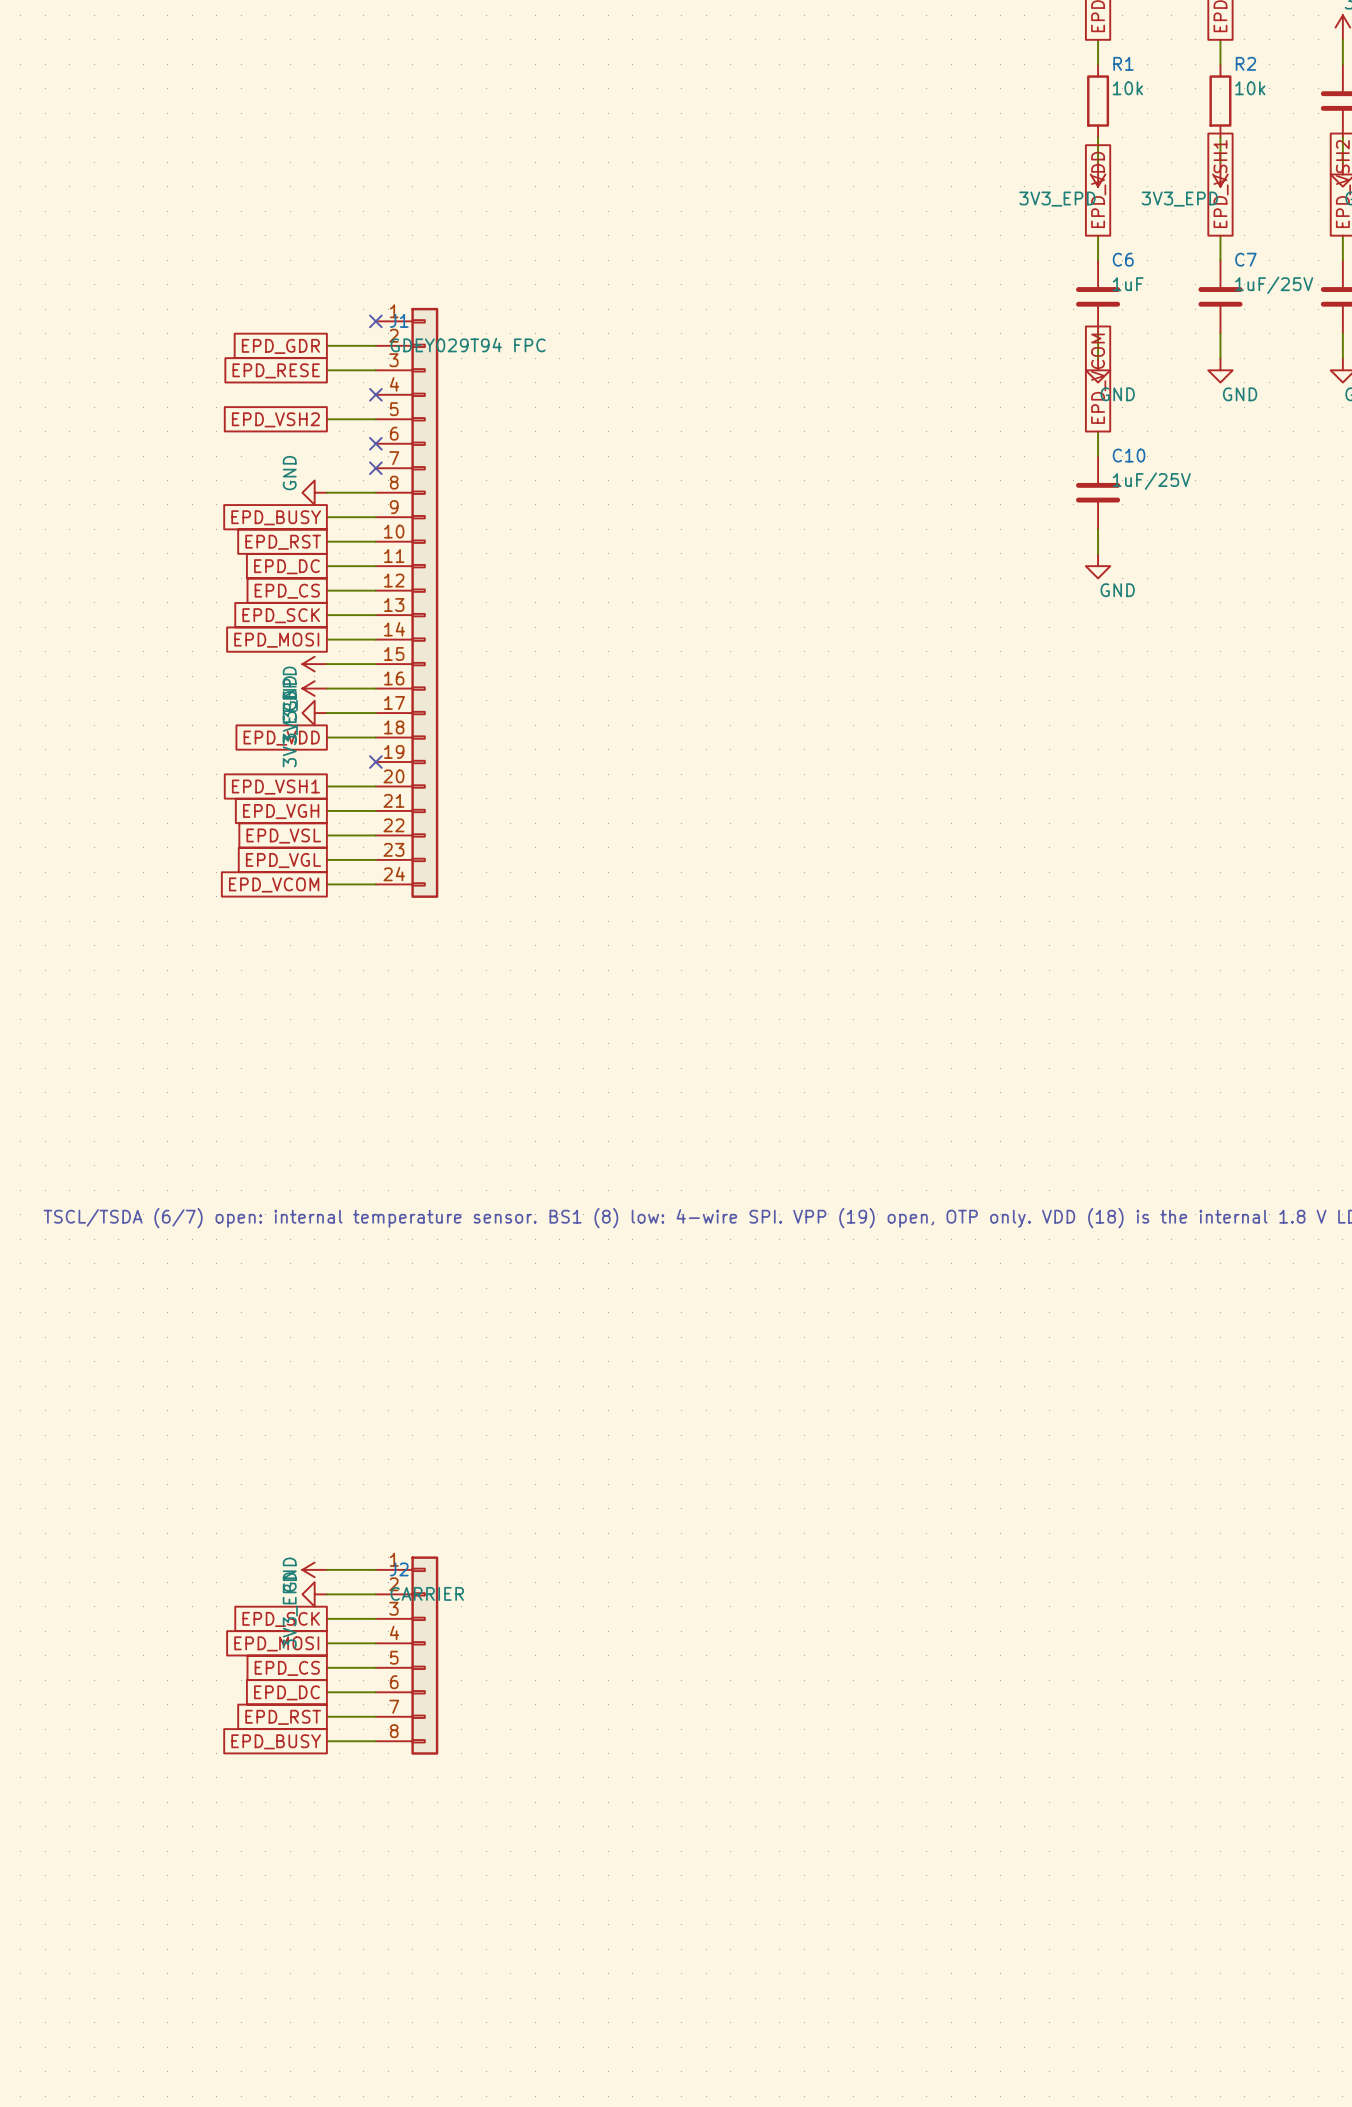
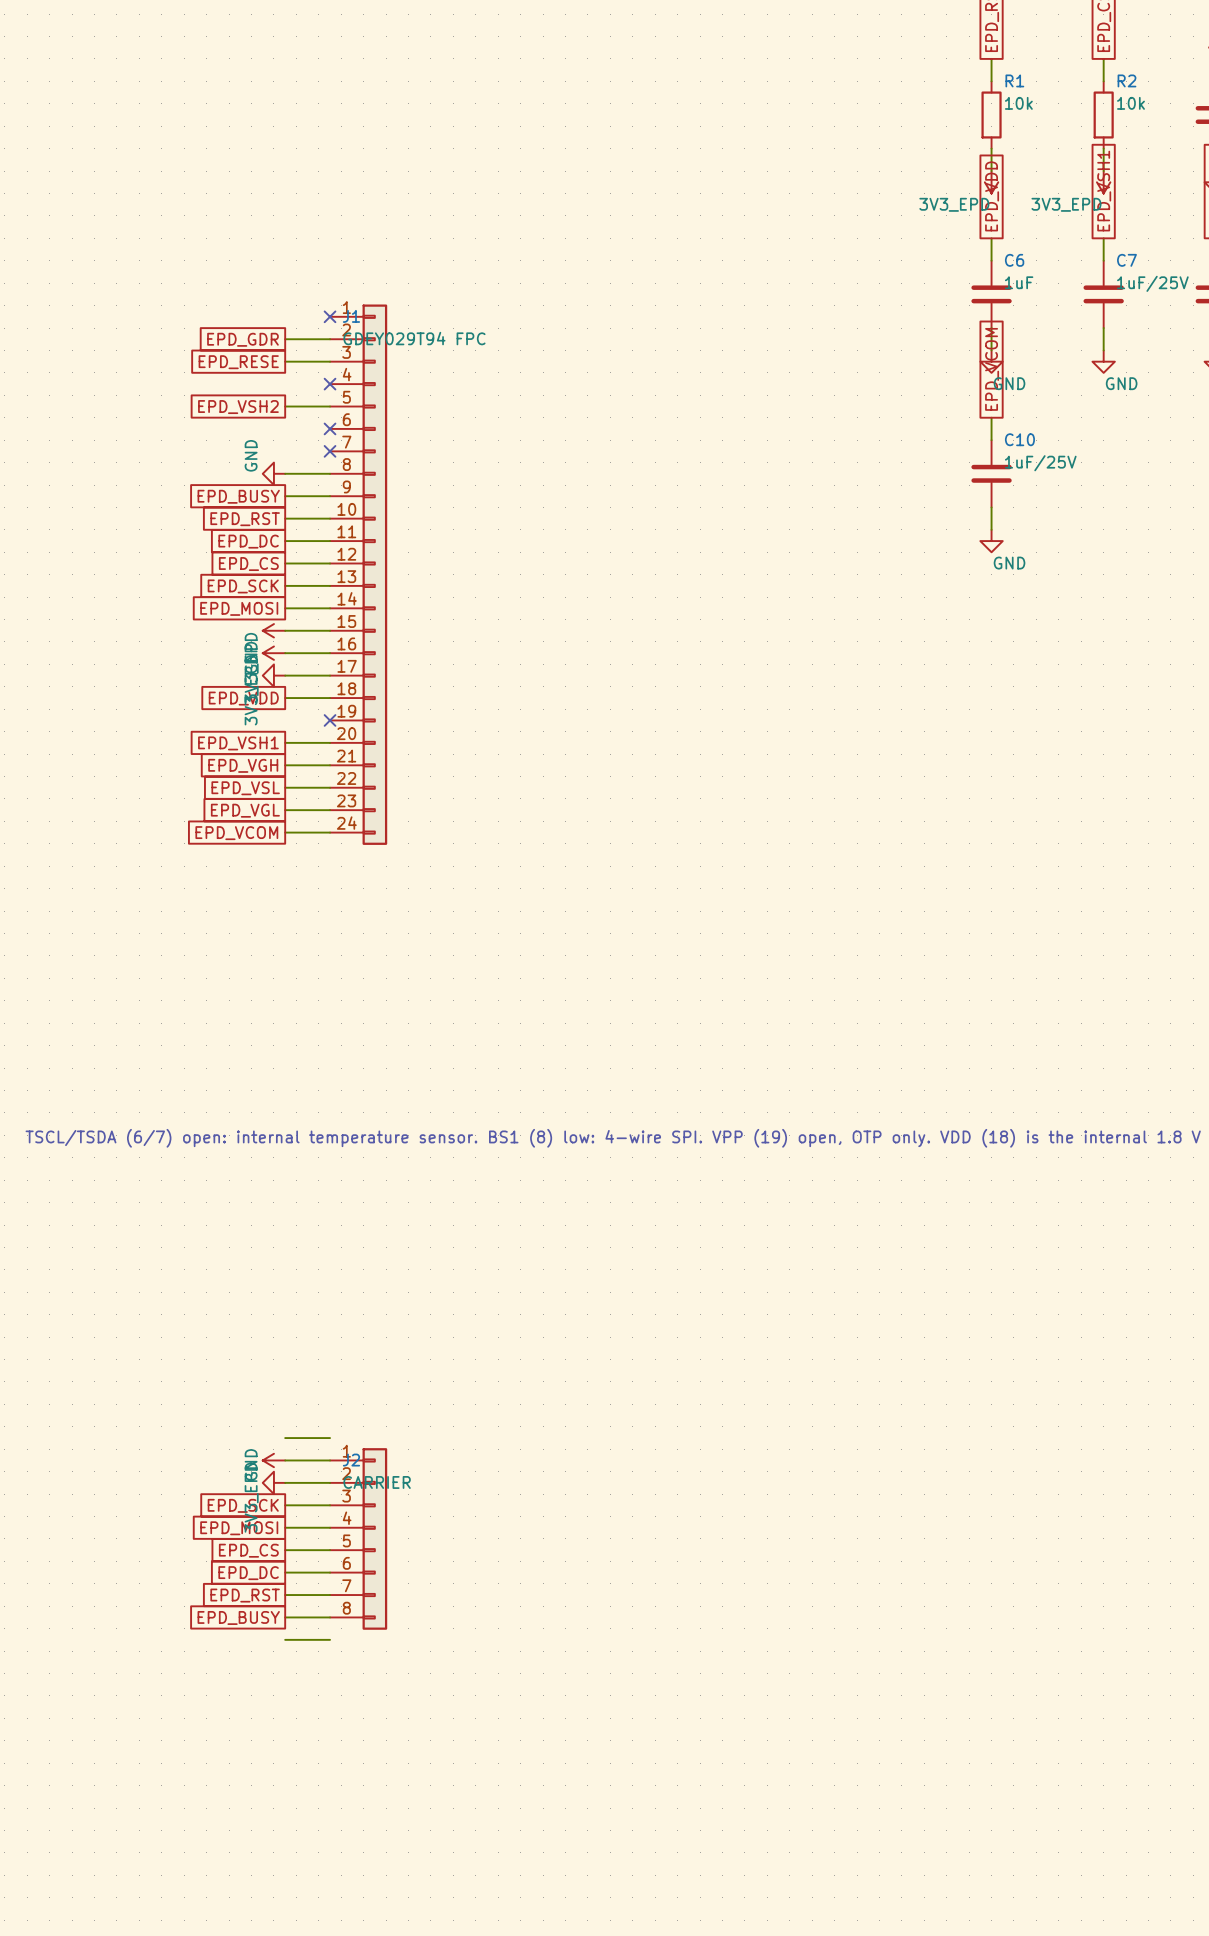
wire: none -> (285, 1438) (330, 1438)
wire: none -> (285, 1639) (330, 1639)

